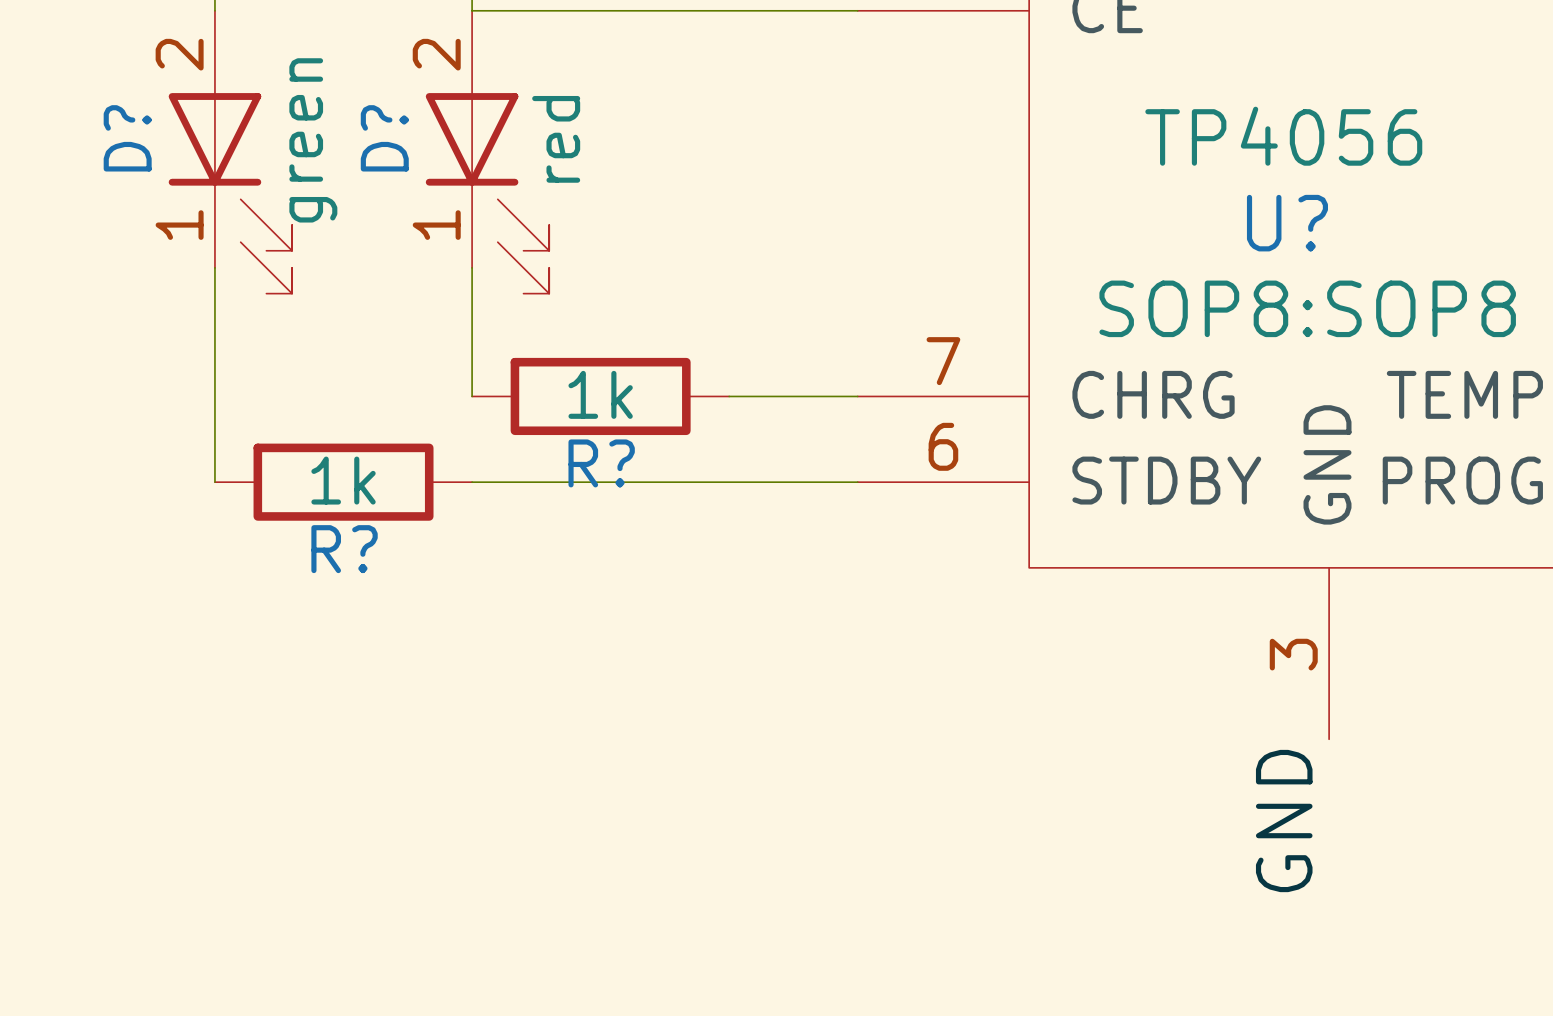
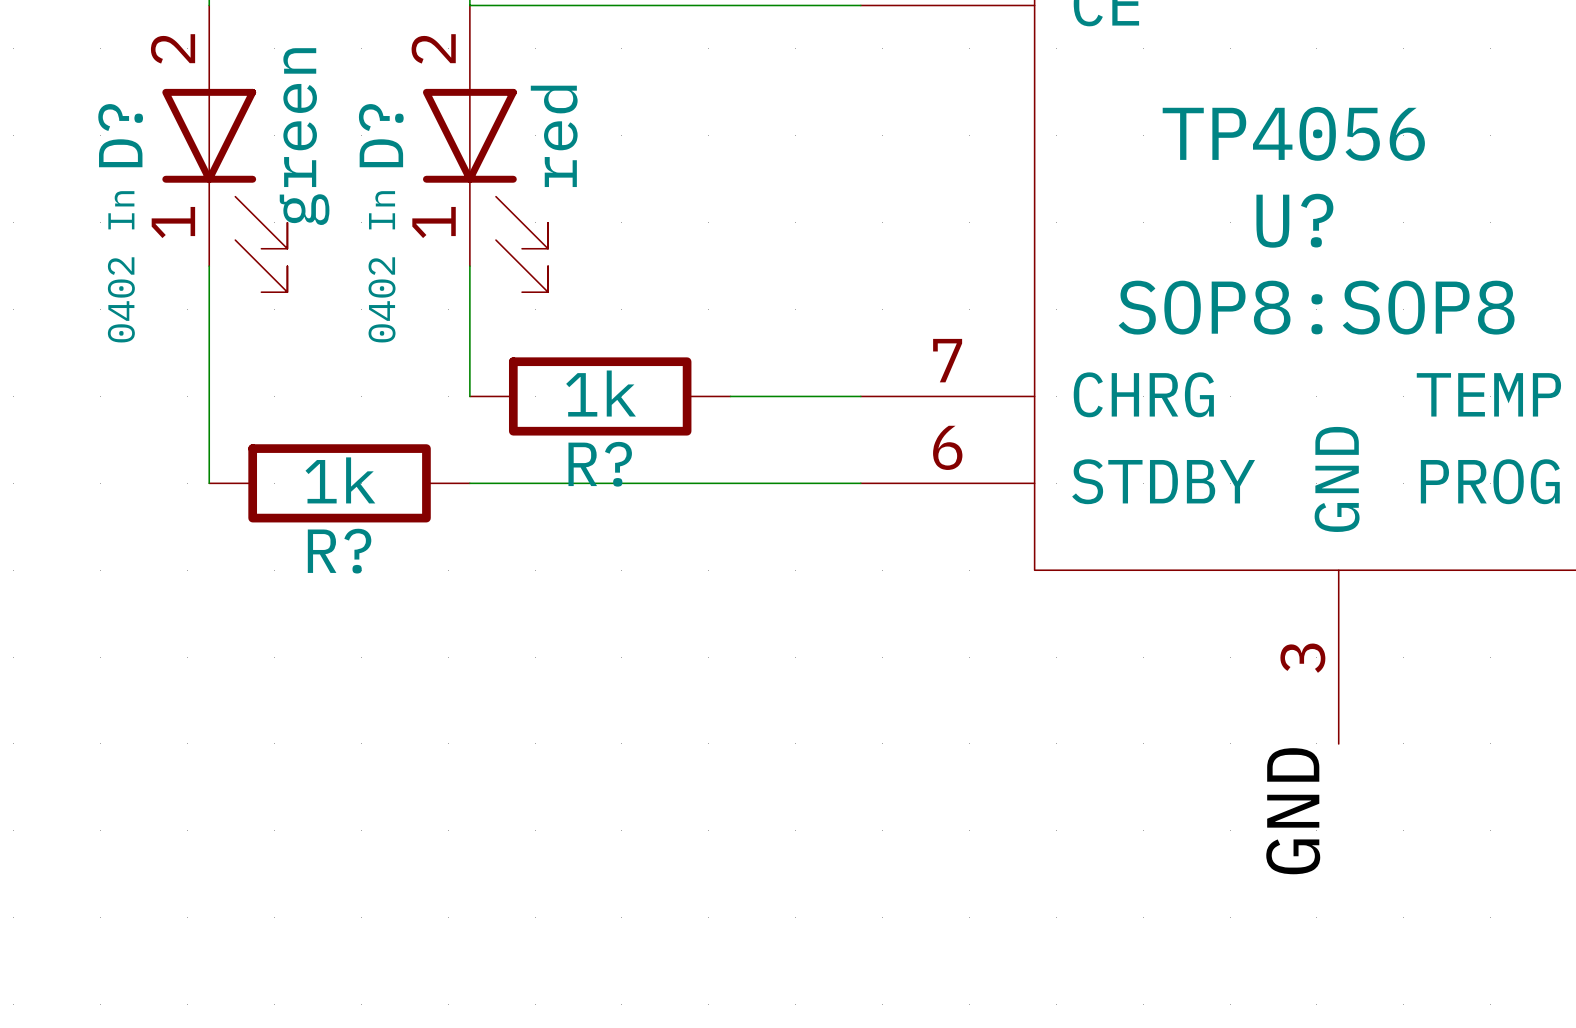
D? text: none -> 0402 In (121, 266)
D? text: none -> 0402 In (382, 266)

